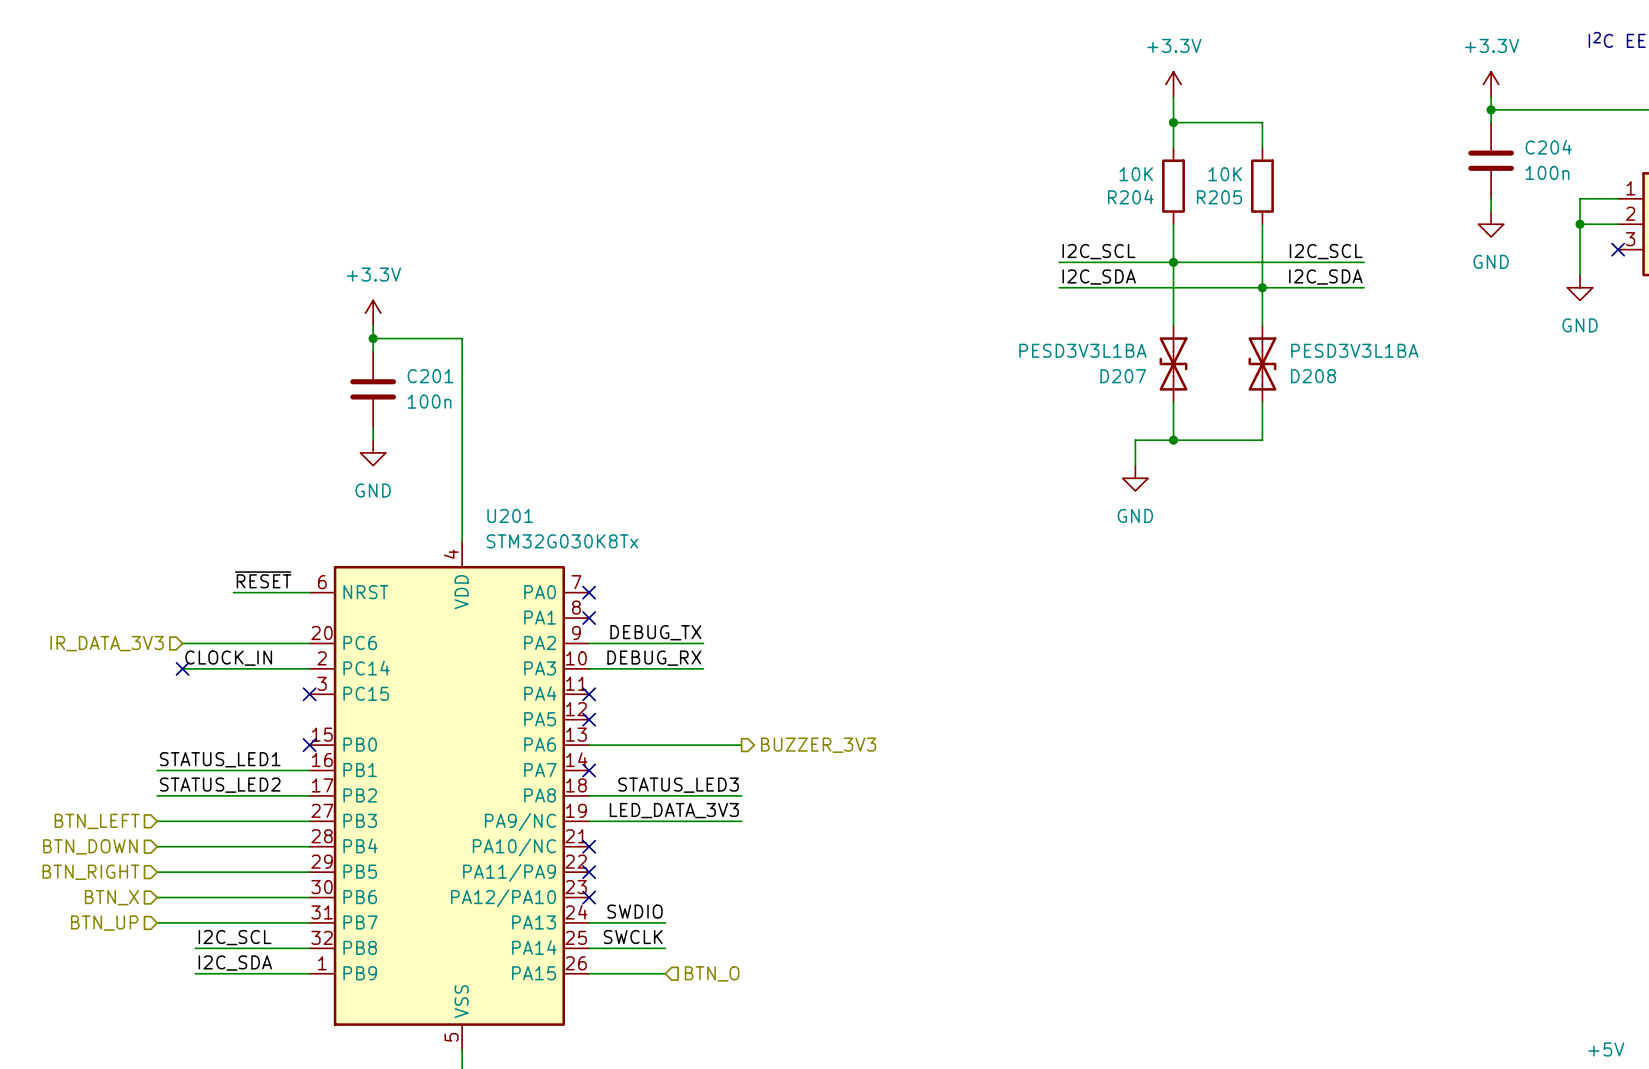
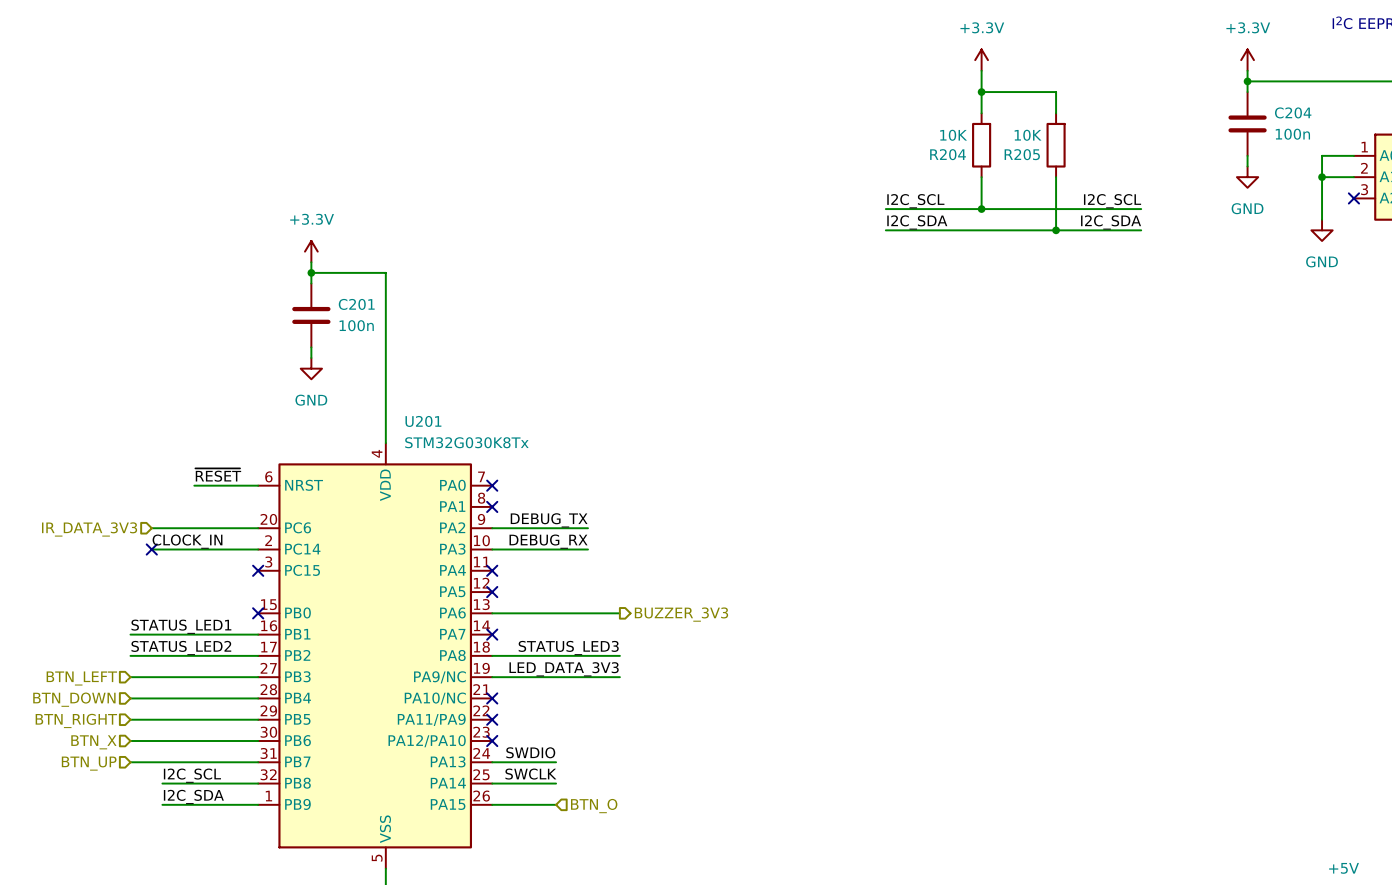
wire: (1173, 262) (1173, 325) -> none
wire: (1262, 287) (1262, 325) -> none
D207: PESD3V3L1BA (1173, 363) -> none
D208: PESD3V3L1BA (1262, 363) -> none
wire: (1173, 402) (1173, 440) -> none
wire: (1262, 402) (1262, 440) (1135, 440) (1135, 465) -> none
junction: (1173, 440) -> none
power symbol: GND (1135, 478) -> none

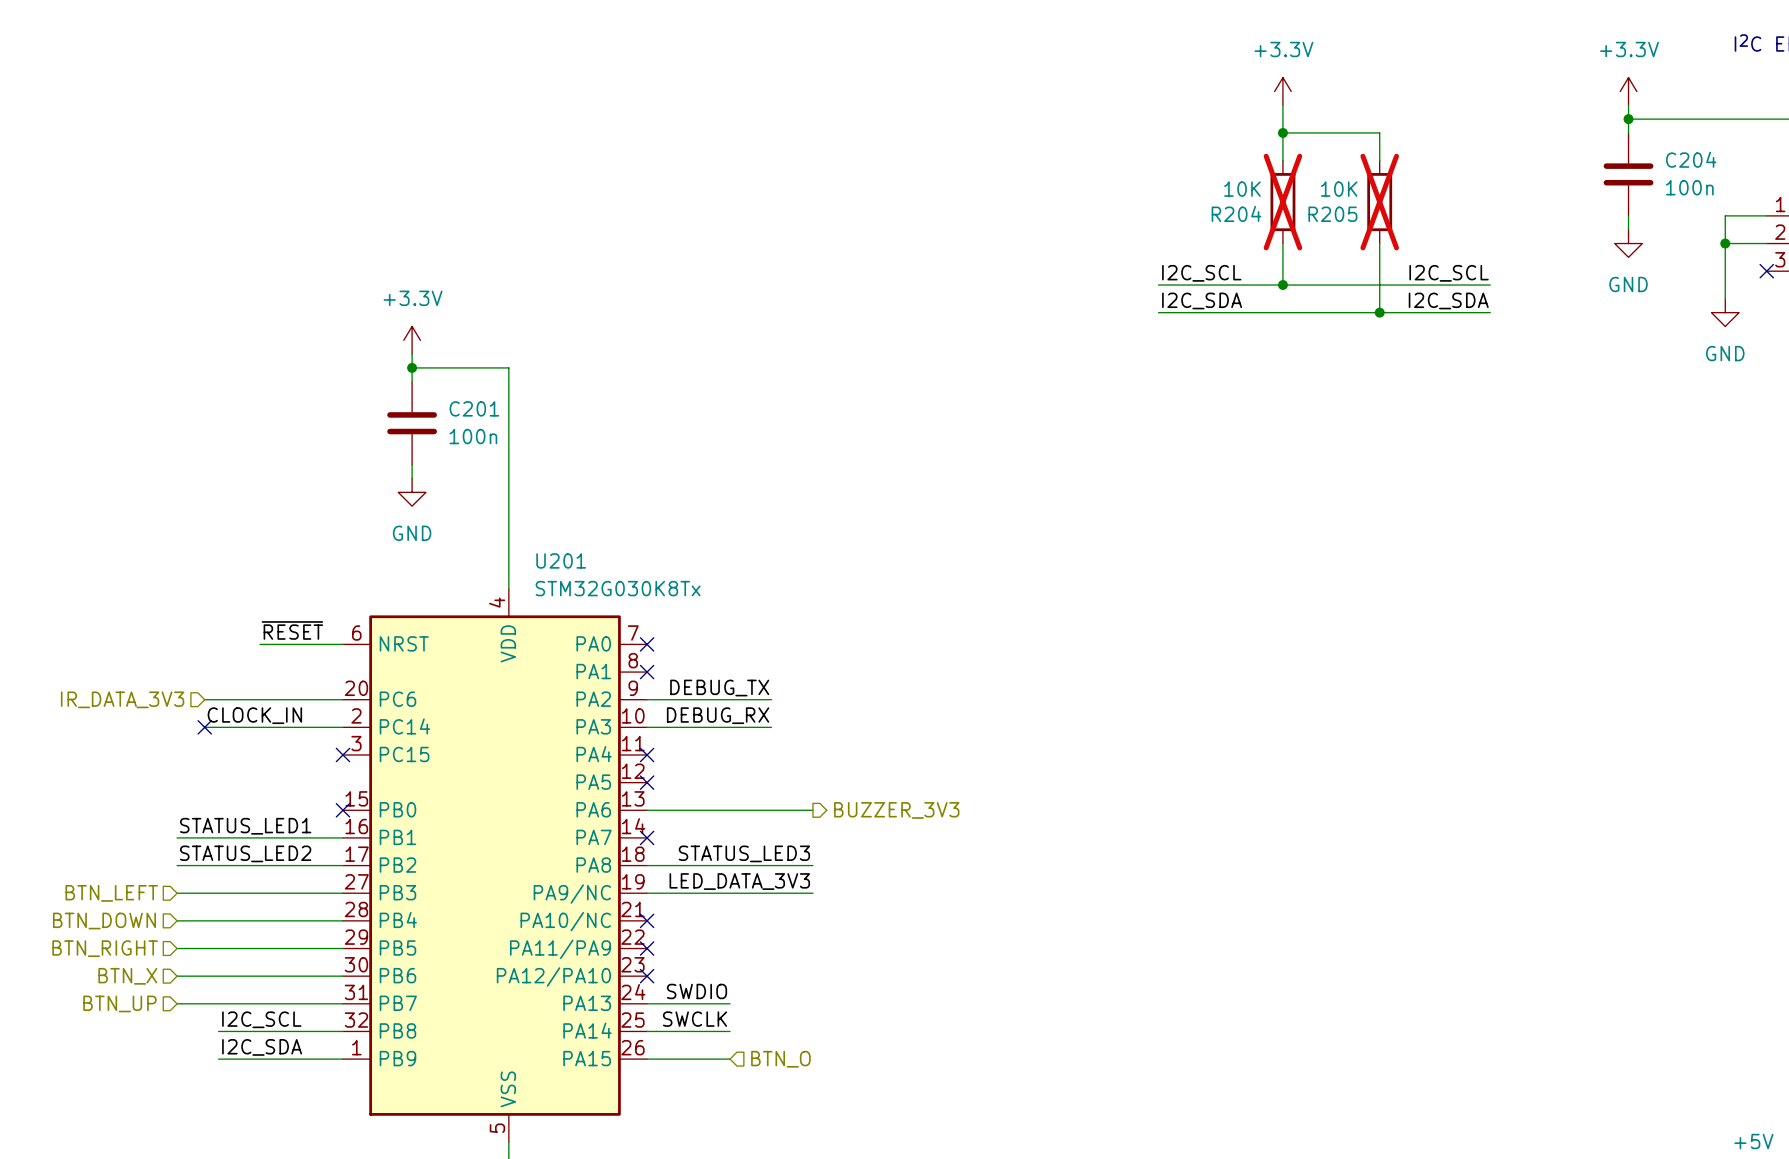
R204 do-not-place cross: none -> (1282, 202)
R205 do-not-place cross: none -> (1379, 202)

